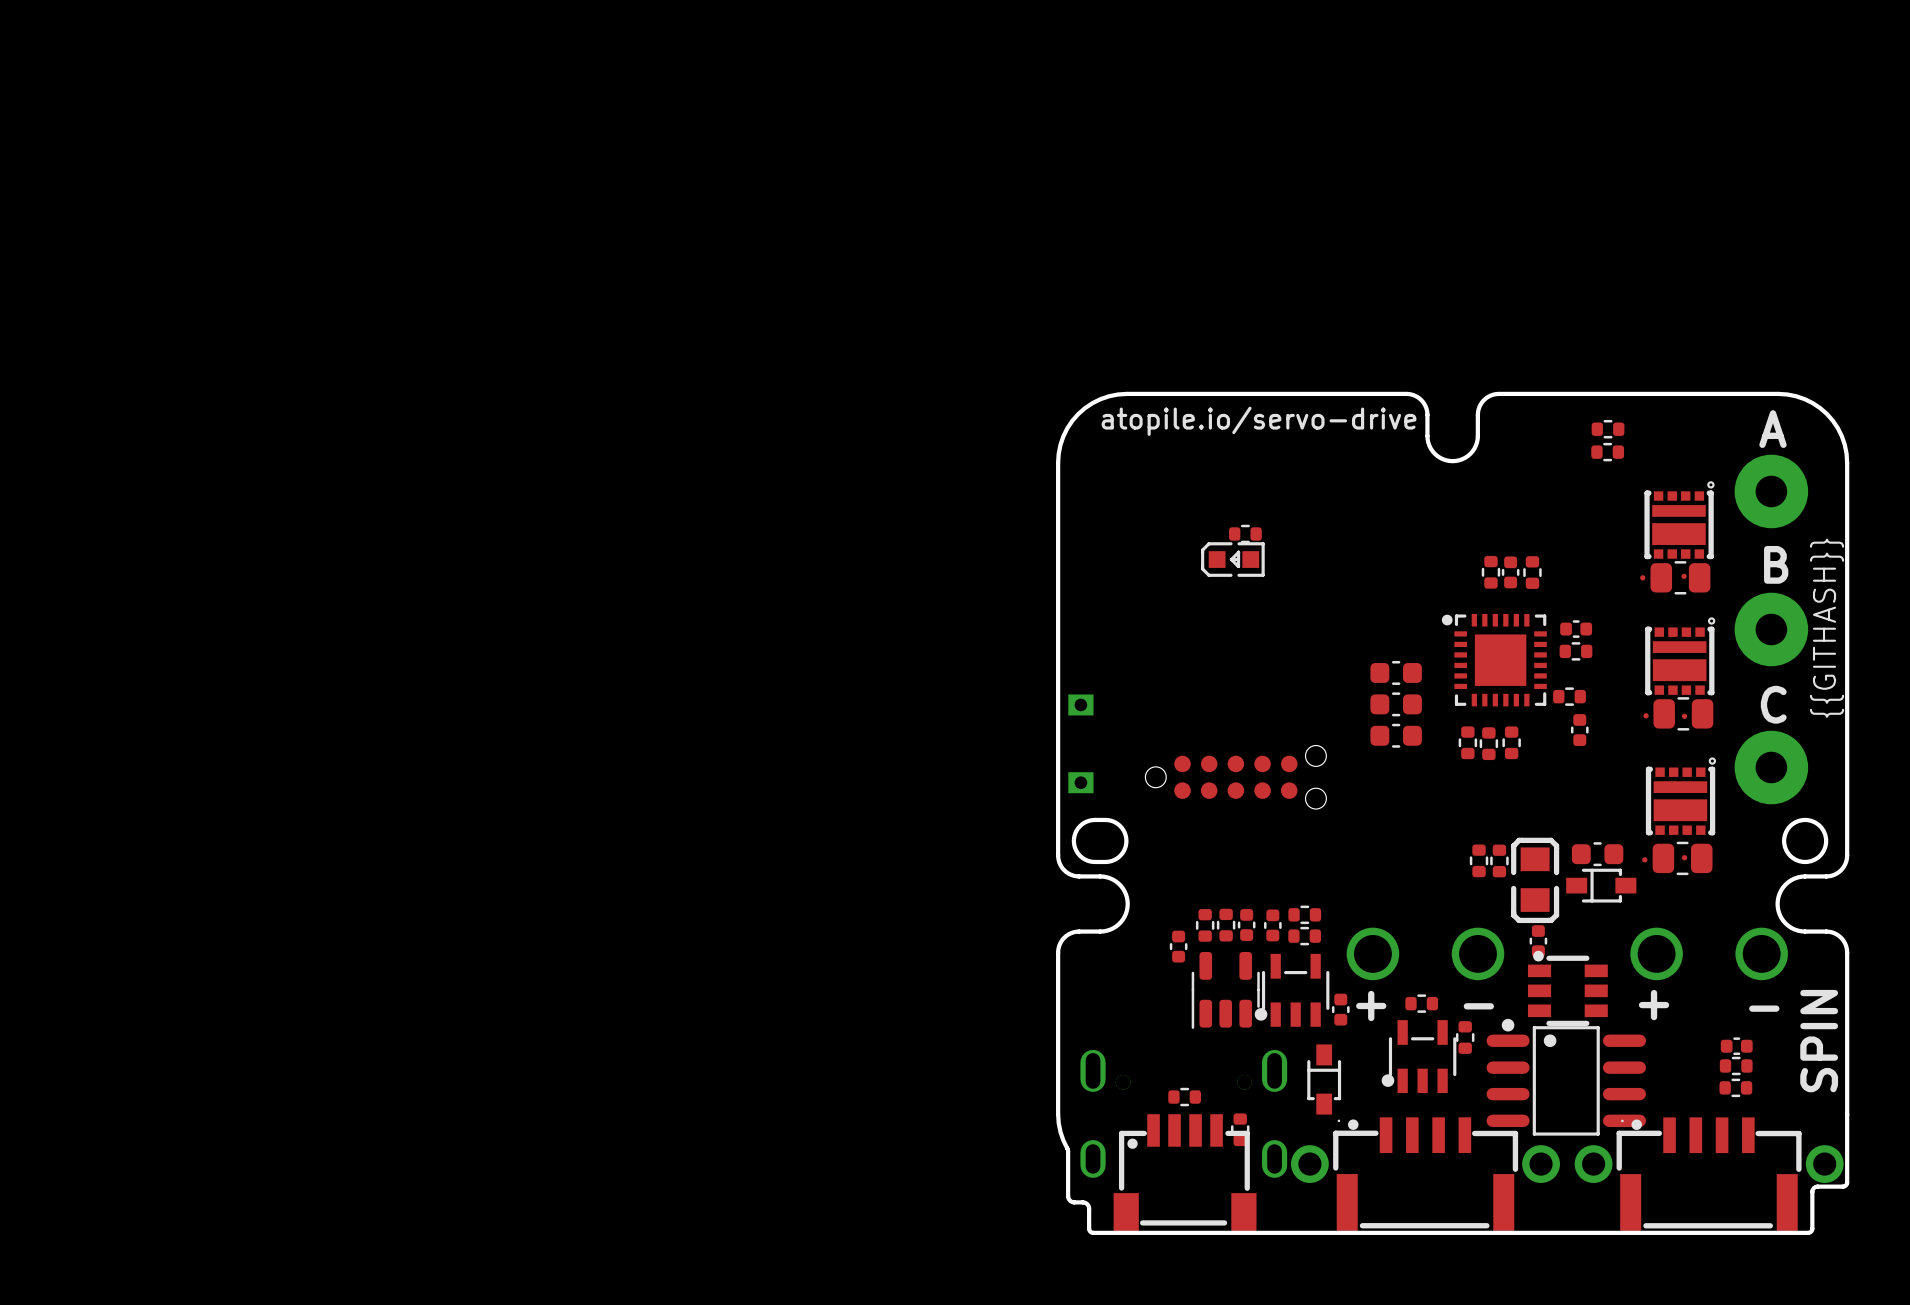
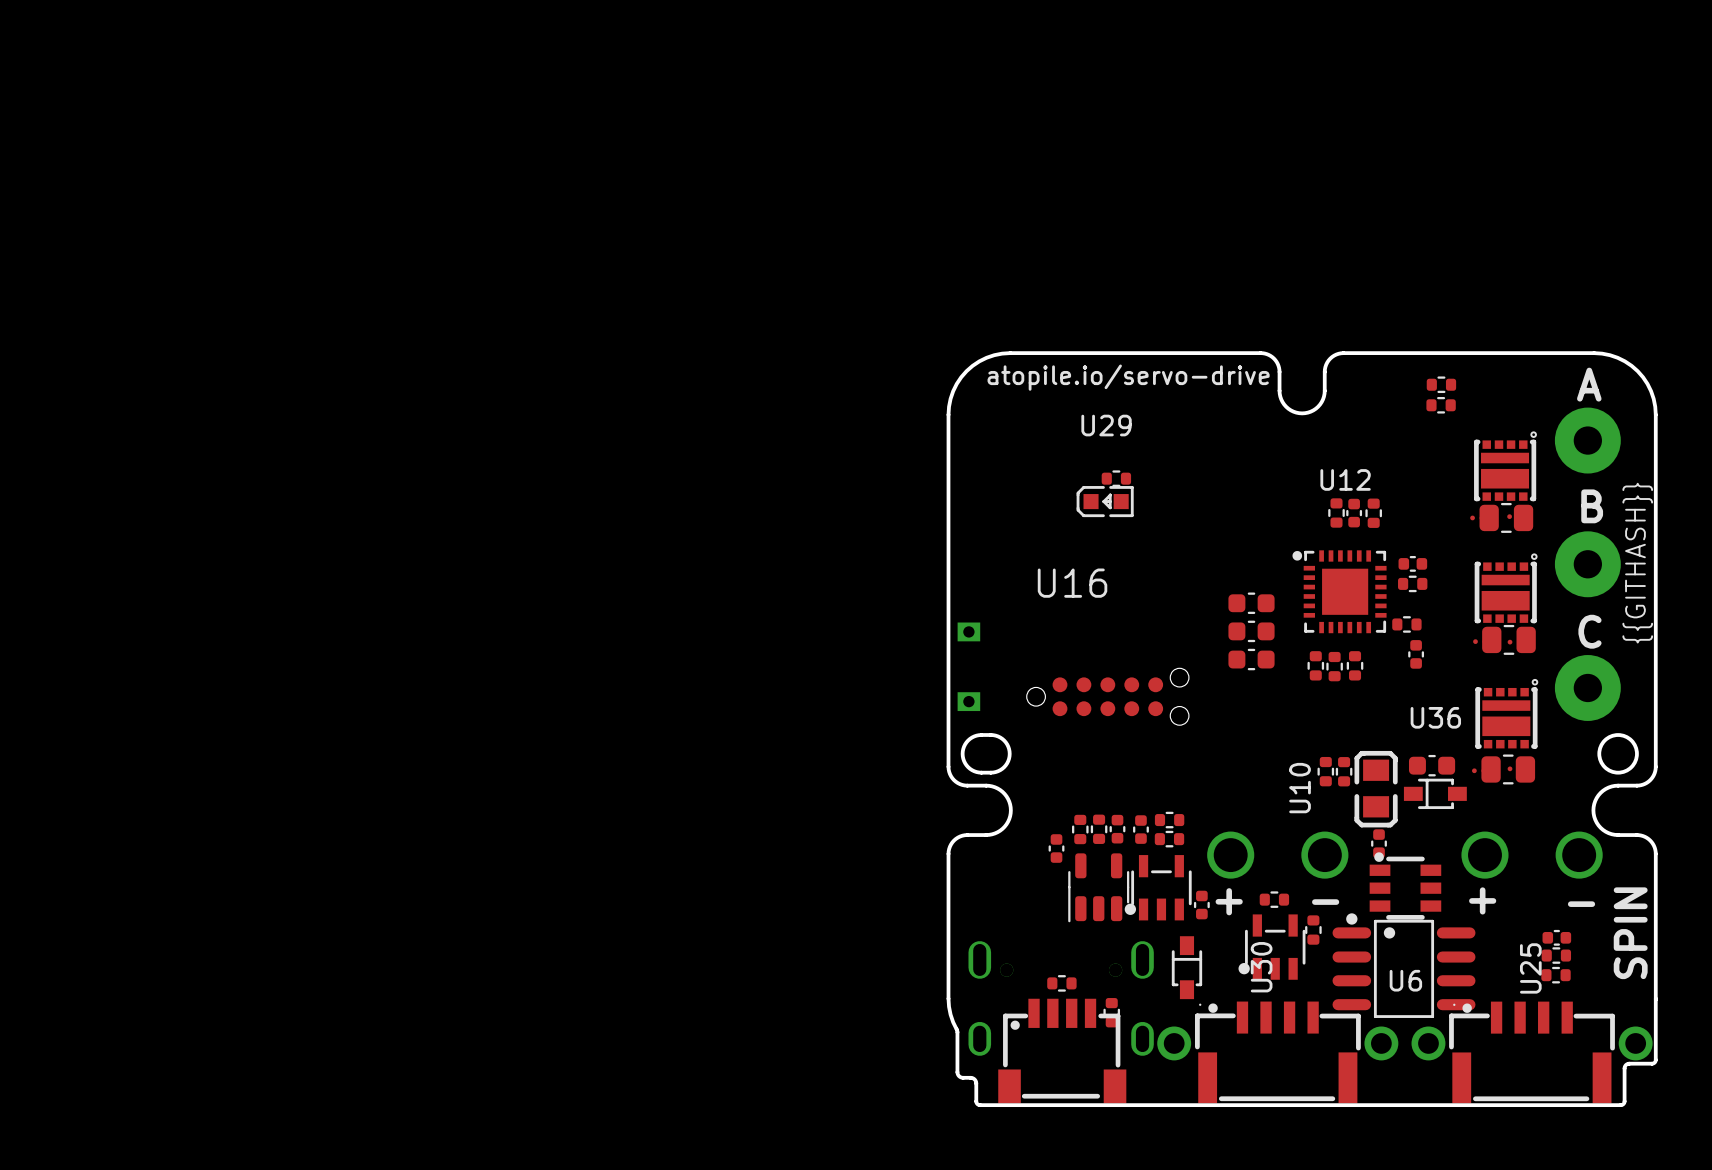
U29 name: none -> U29 (1106, 425)
U12 name: none -> U12 (1345, 479)
U16 name: none -> U16 (1072, 583)
U36 name: none -> U36 (1435, 717)
U10 name: none -> U10 (1300, 788)
U30 name: none -> U30 (1261, 967)
U25 name: none -> U25 (1530, 968)
U6 name: none -> U6 (1405, 980)

